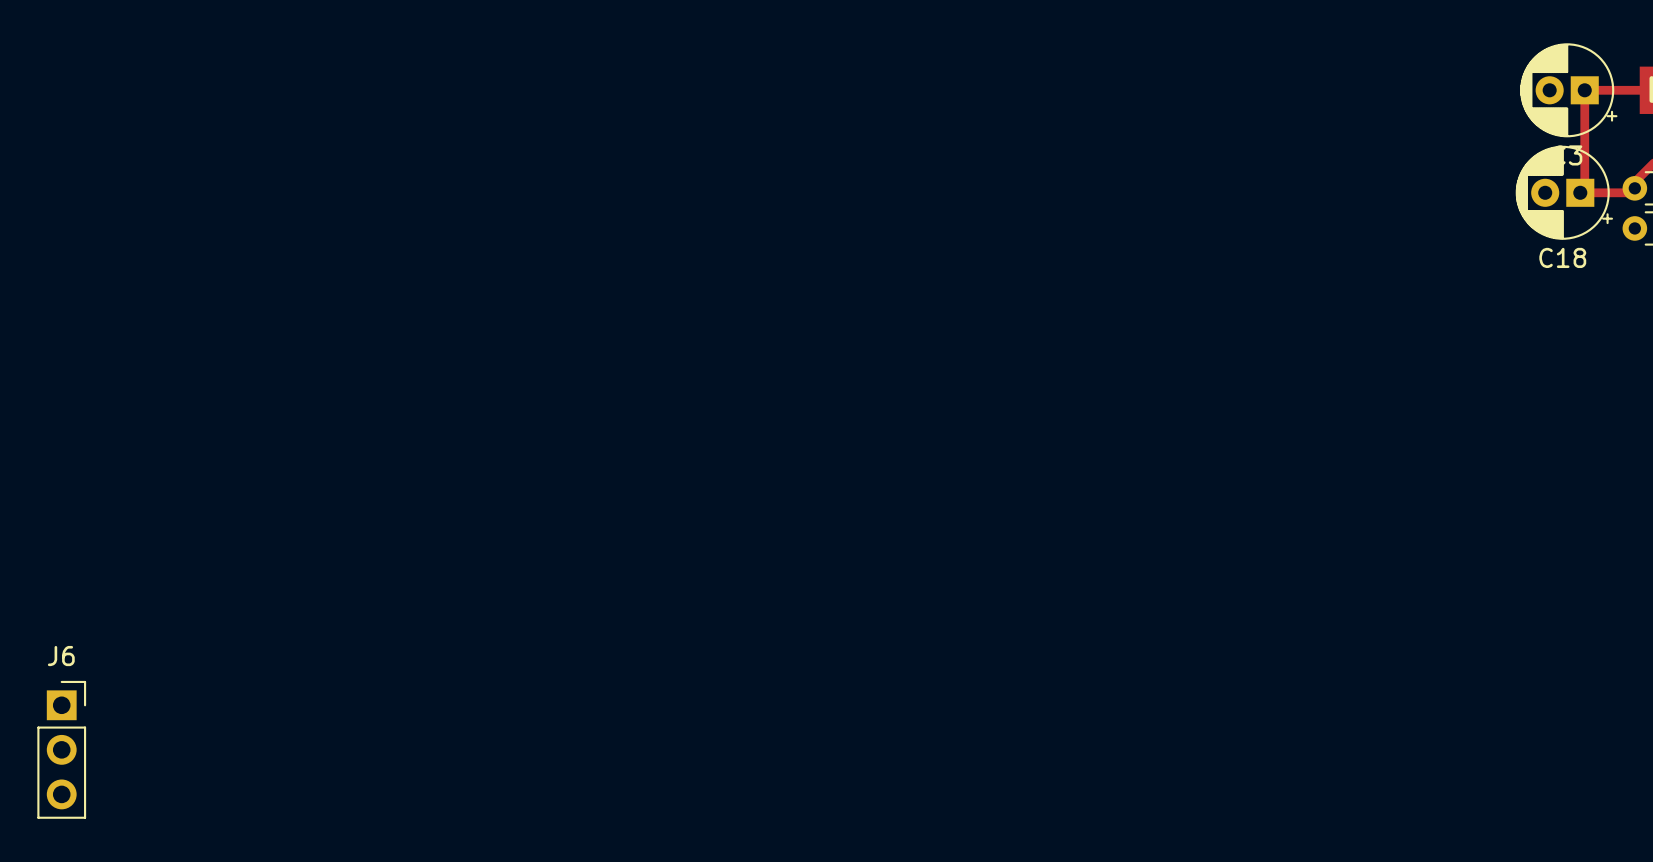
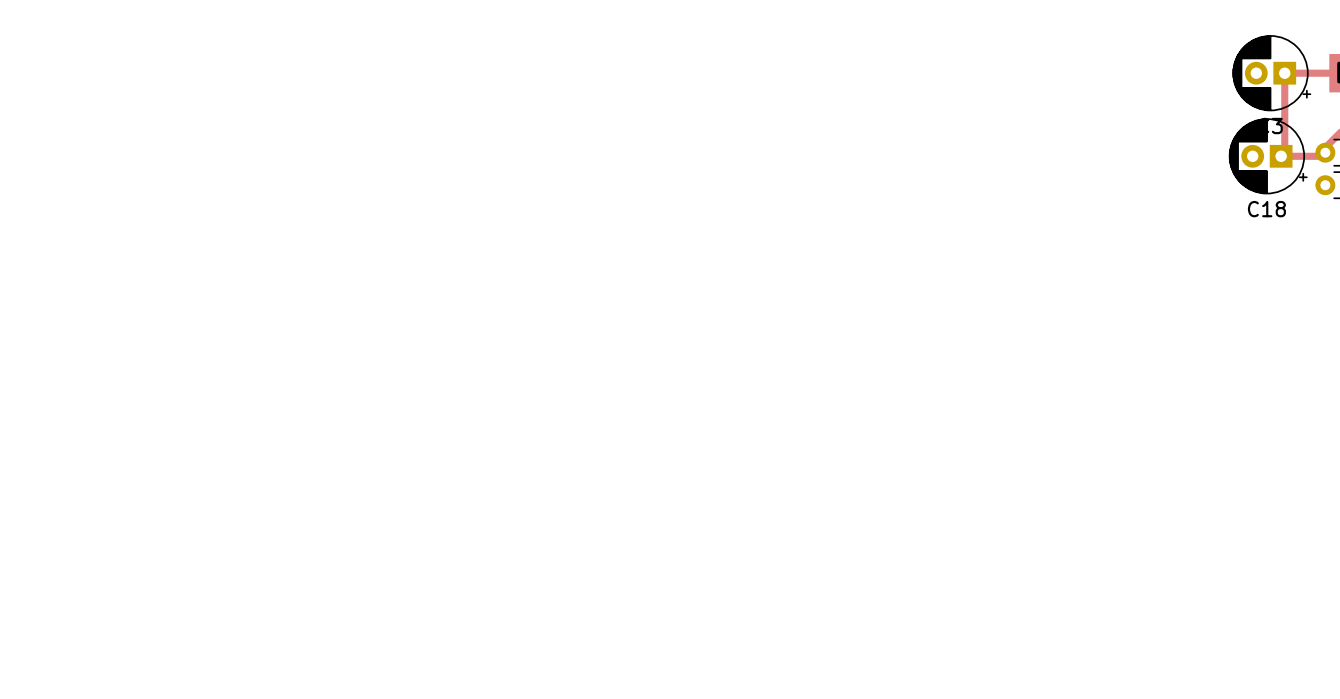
J6: (61, 749) -> none

